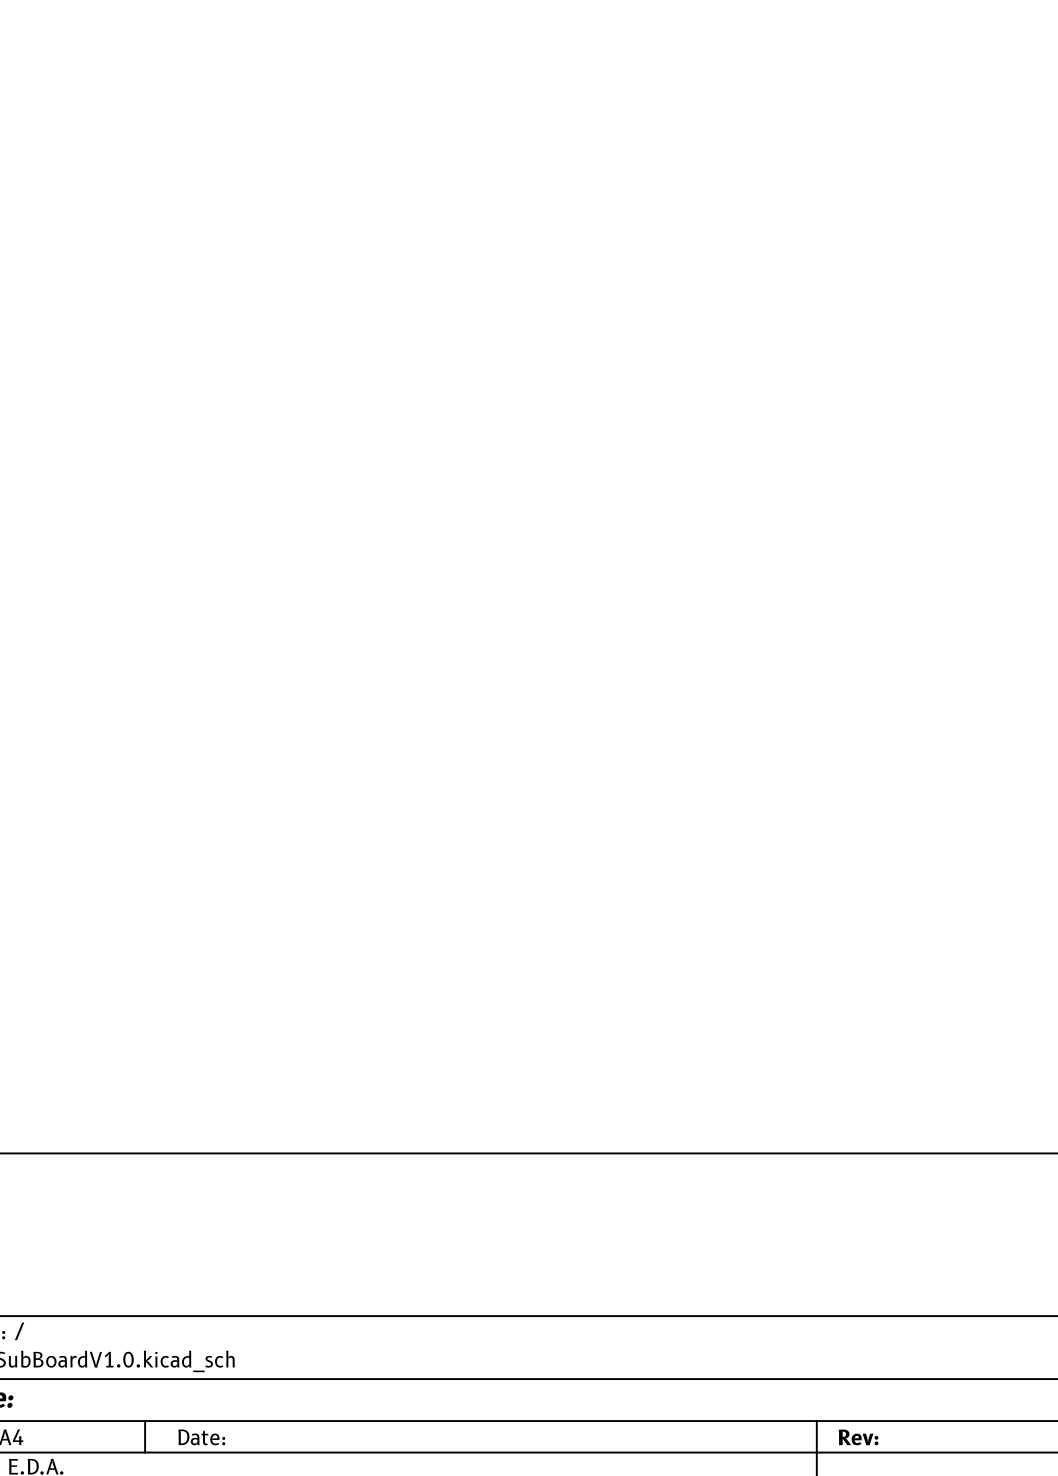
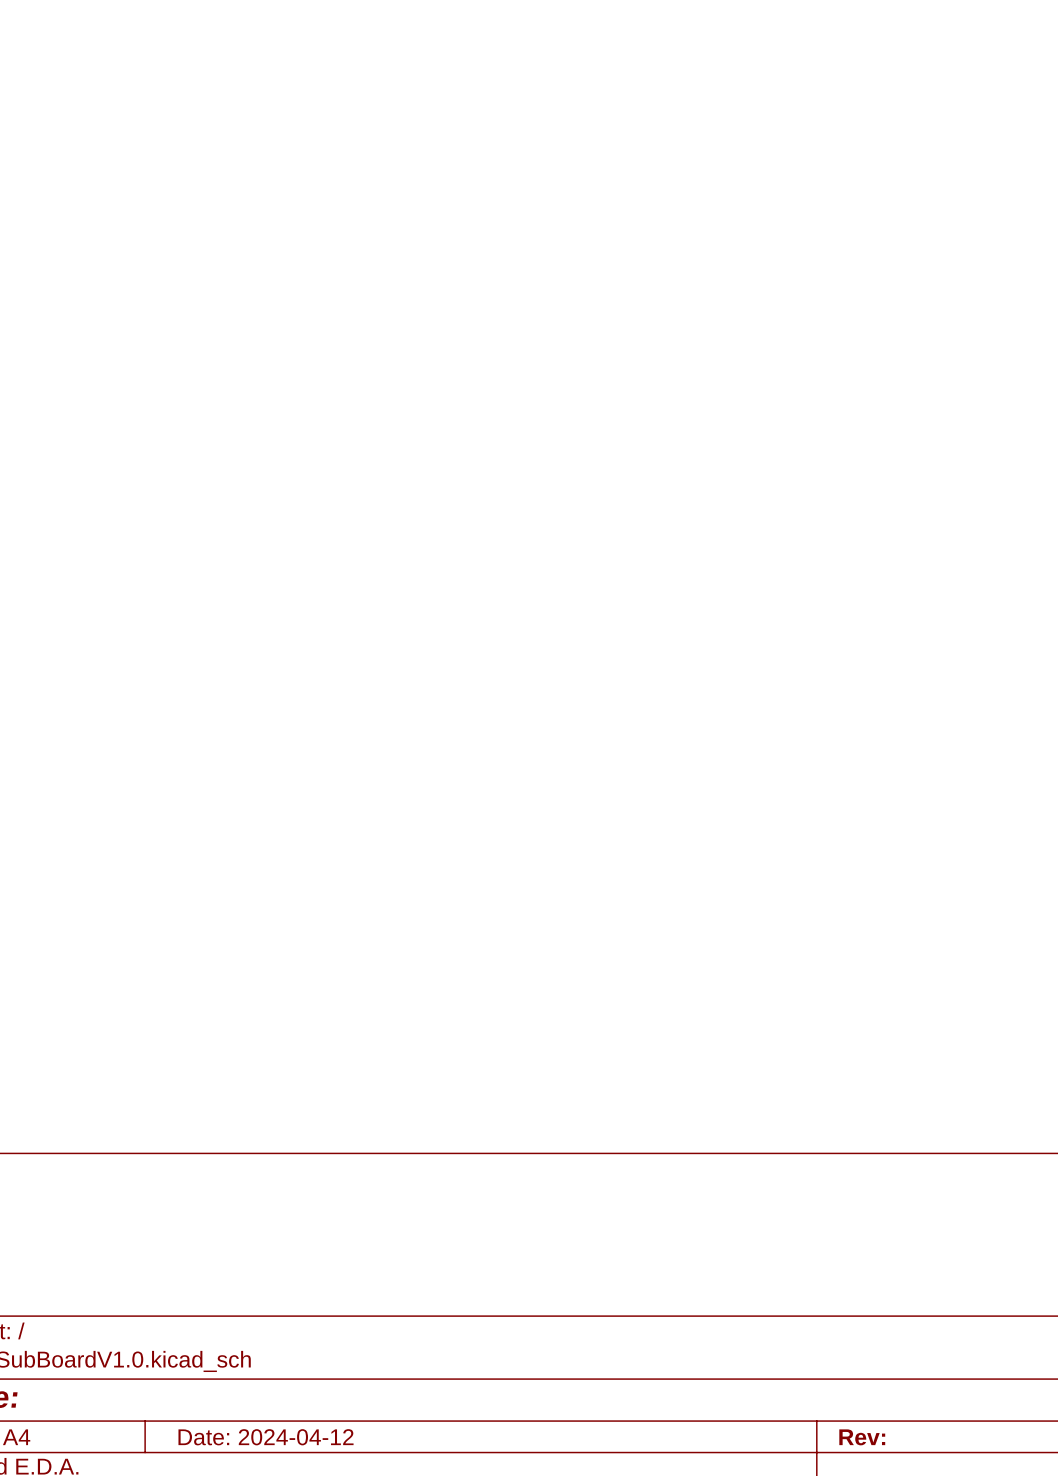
title block: Date: (201, 1437) -> Date: 2024-04-12 (266, 1437)

